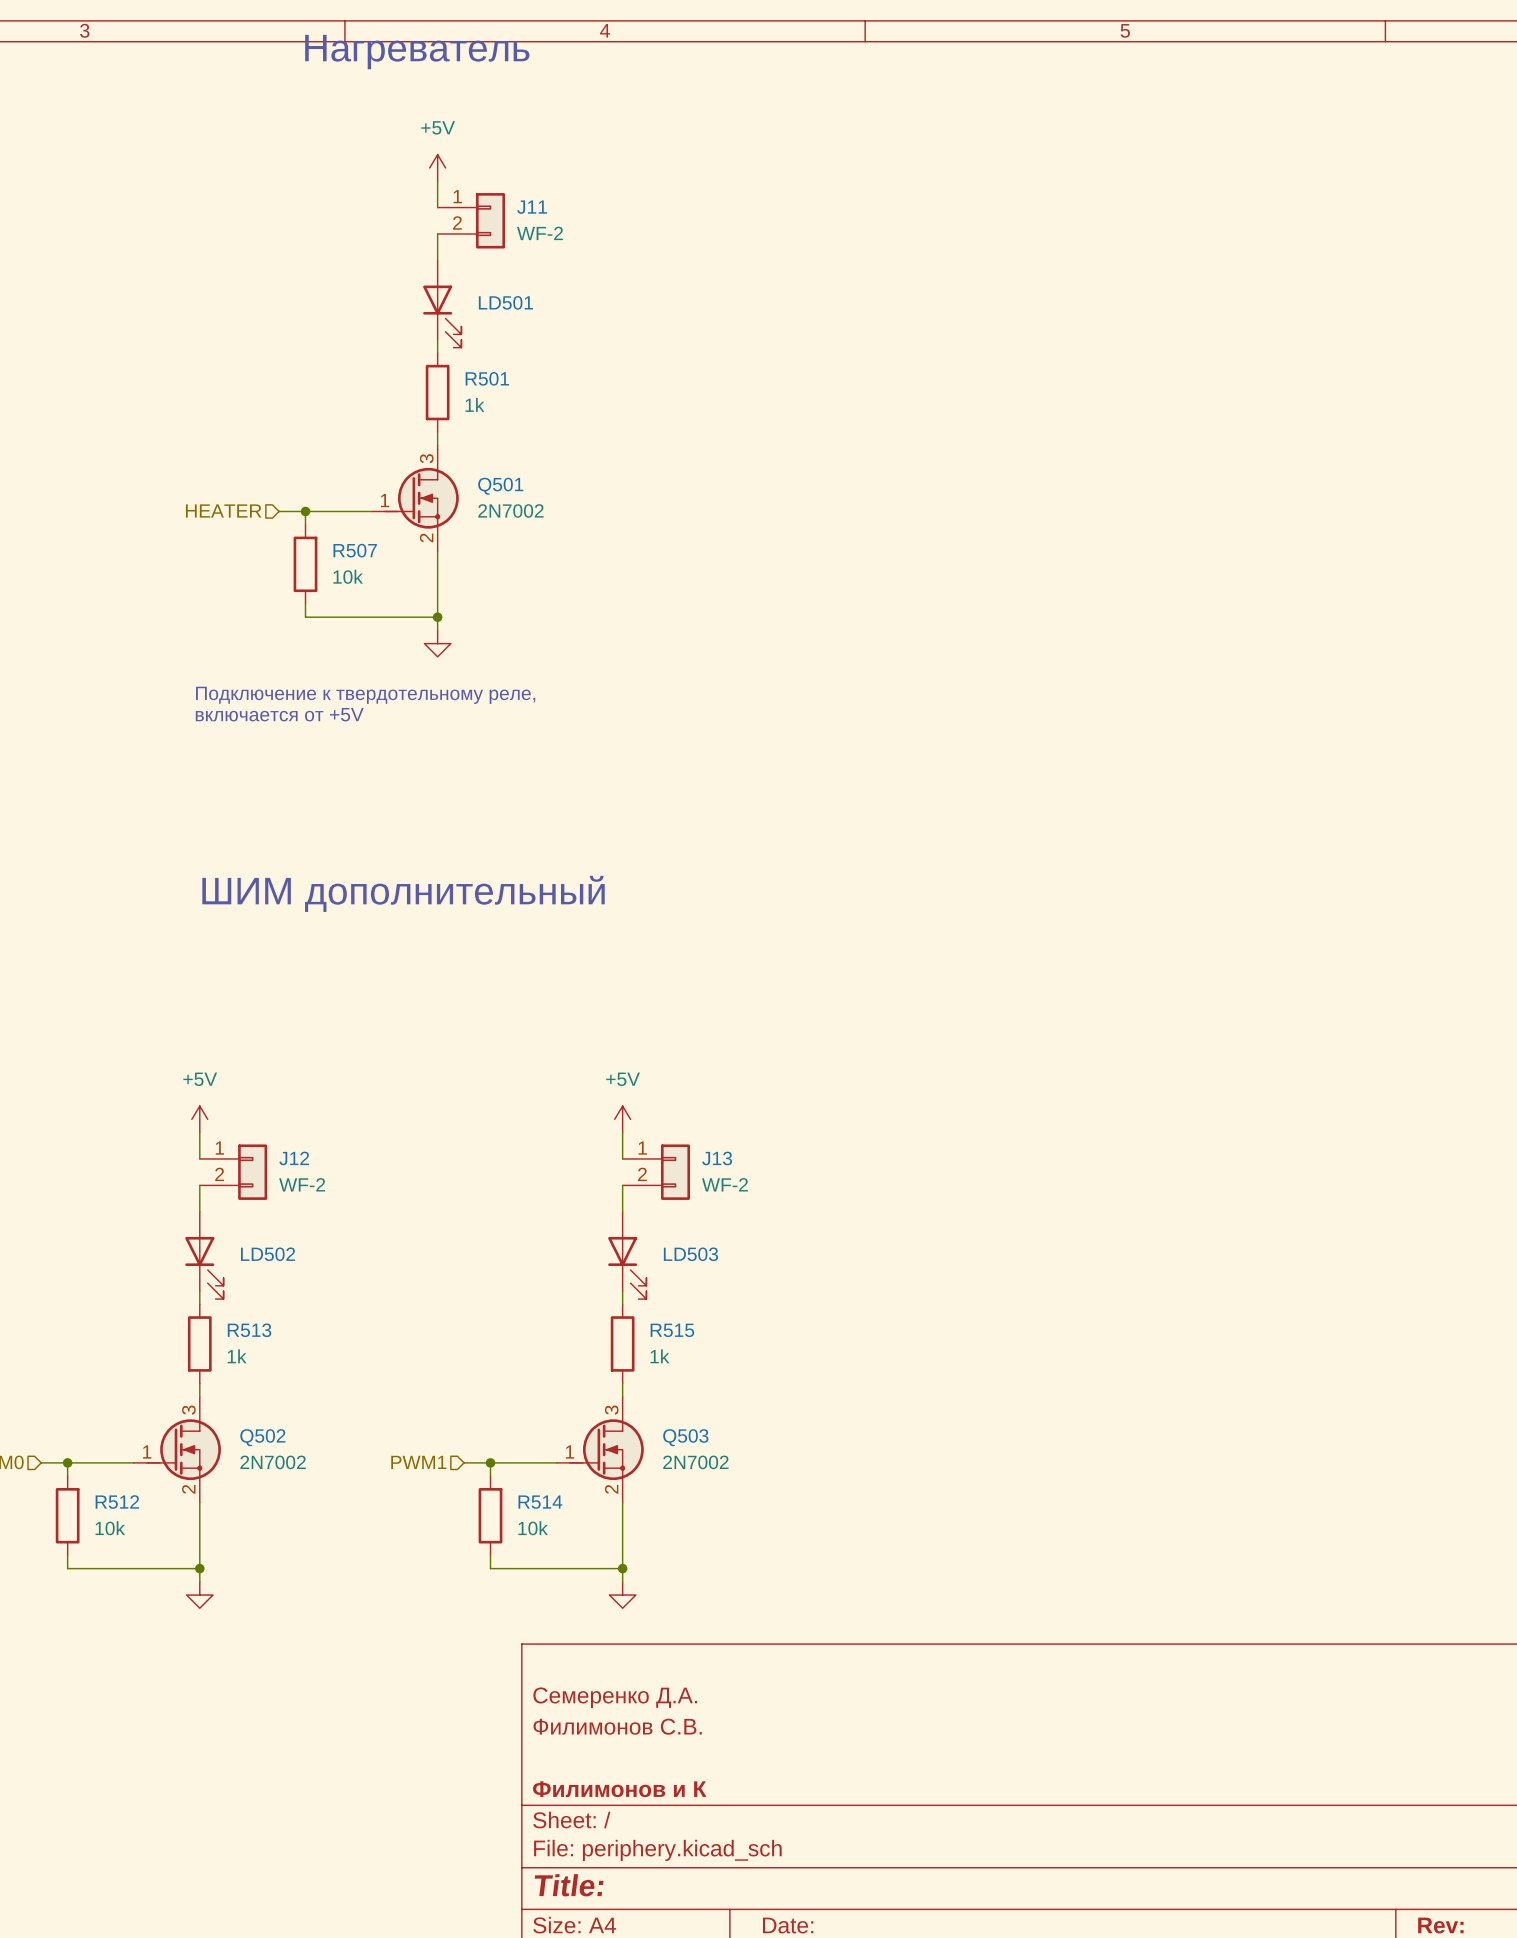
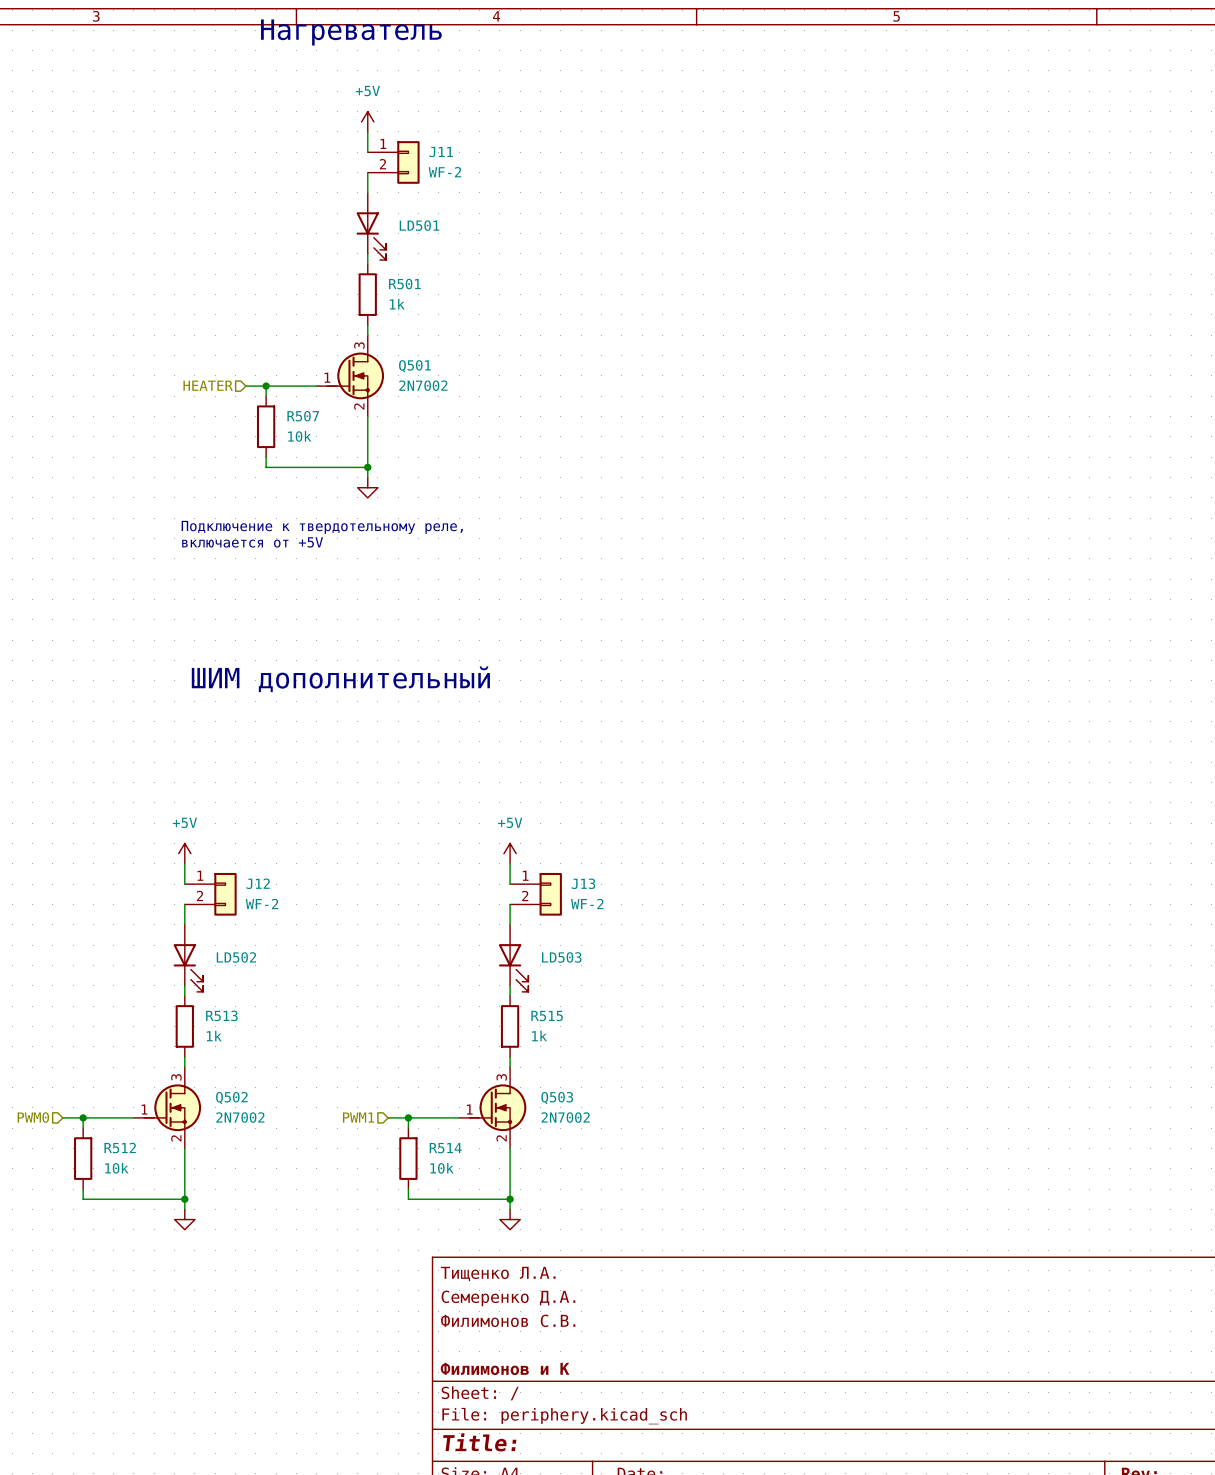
title block: none -> Тищенко Л.А. (498, 1273)

